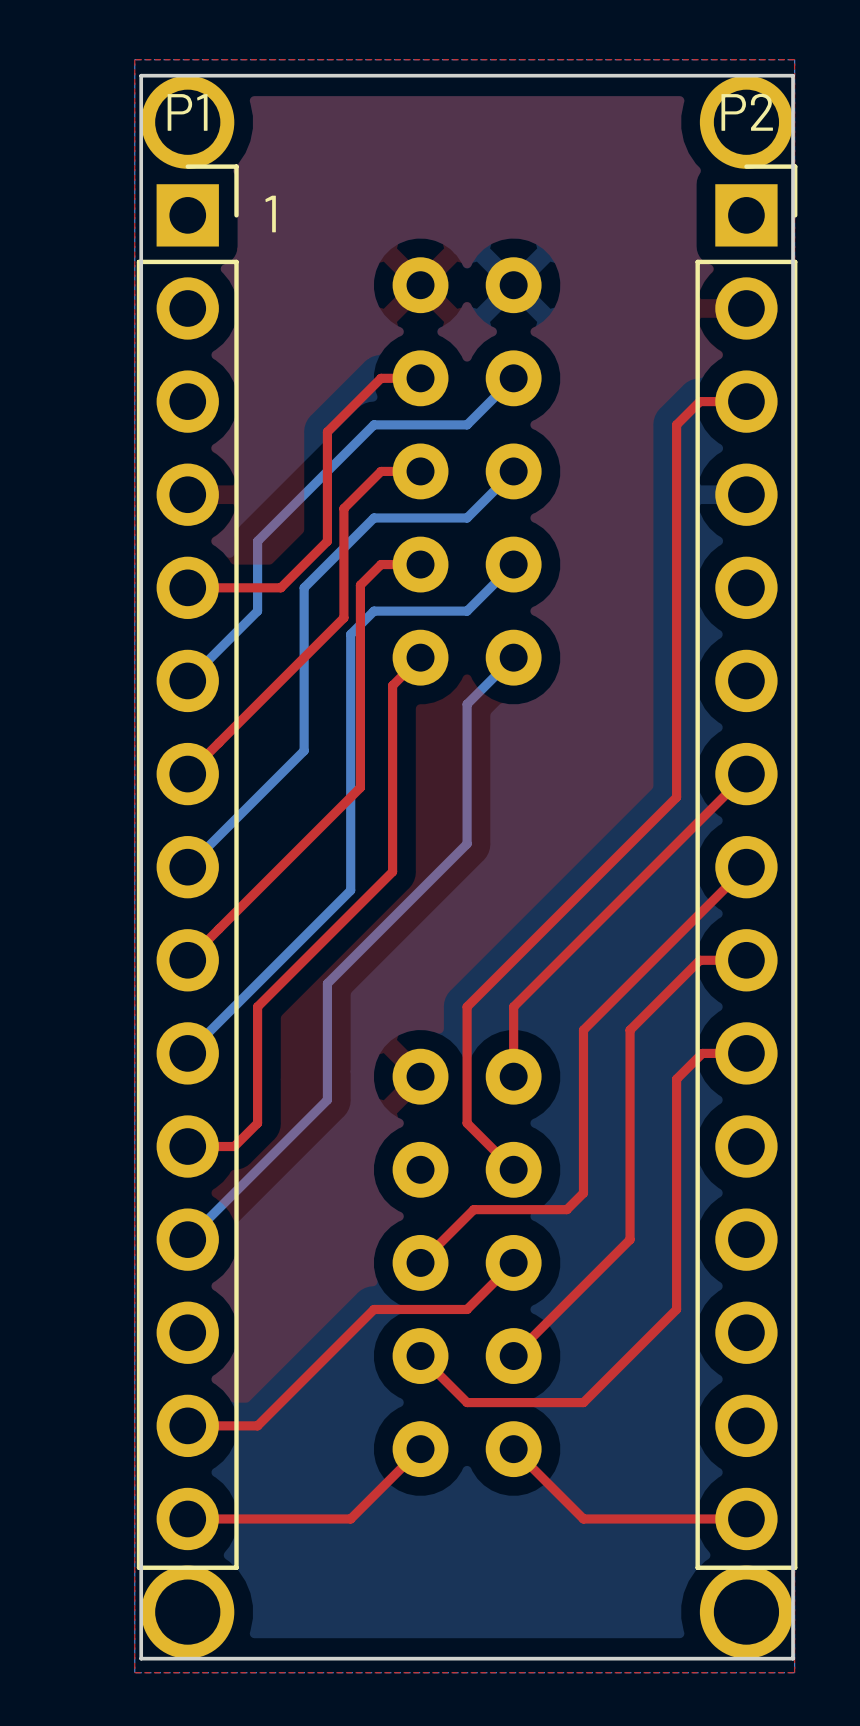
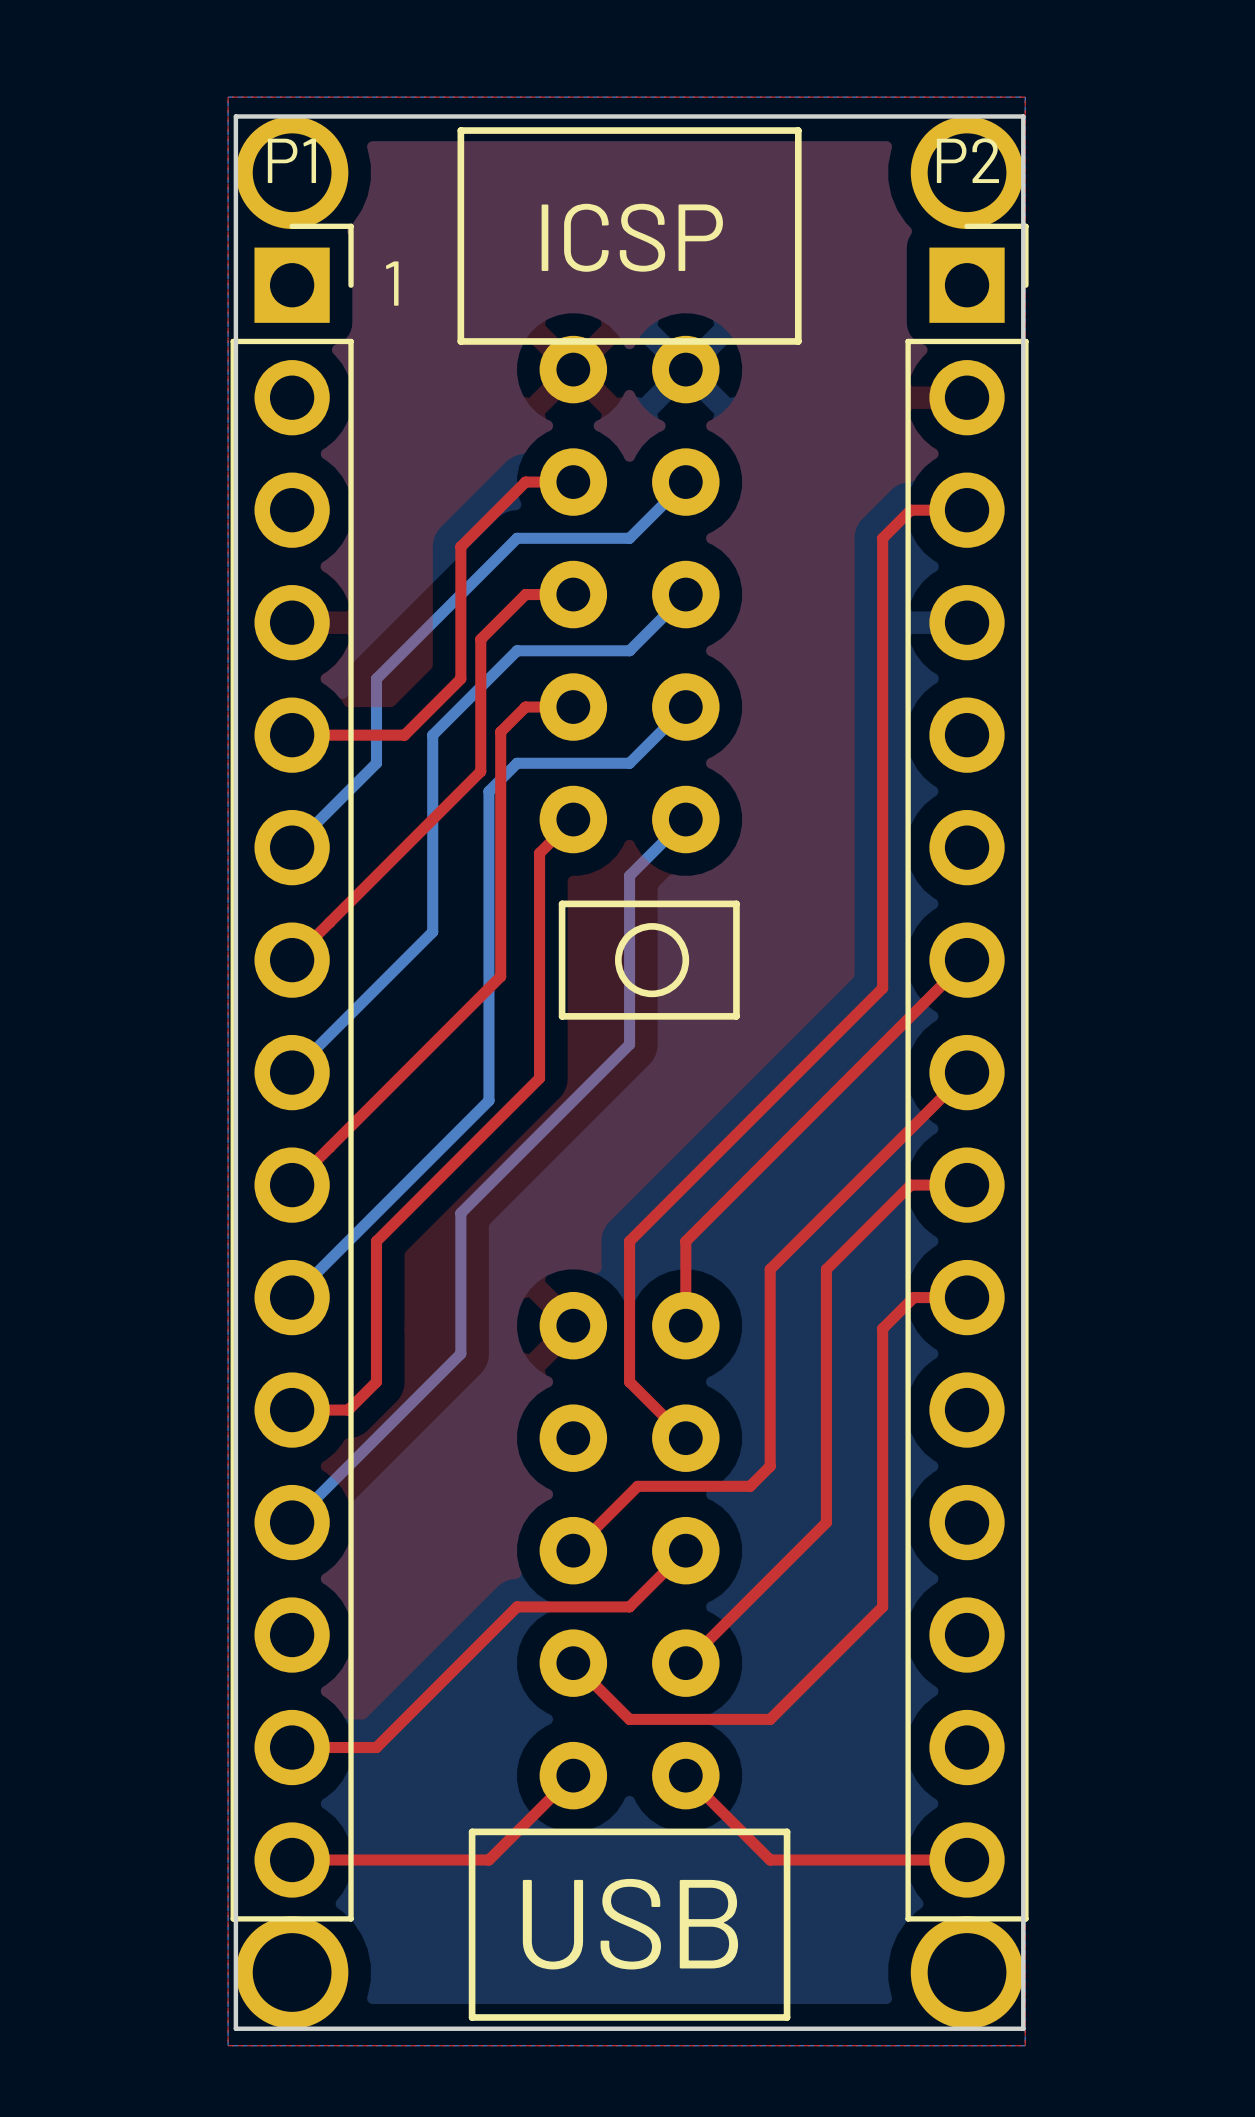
line: none -> (460, 130) (798, 130) (798, 341) (460, 341) (460, 130)
text: none -> ICSP (632, 237)
line: none -> (562, 903) (736, 903) (736, 1016) (562, 1016) (562, 903)
drawing: none -> [615, 923, 690, 998]
line: none -> (472, 1831) (787, 1831) (787, 2017) (472, 2017) (472, 1831)
text: none -> USB (630, 1924)

